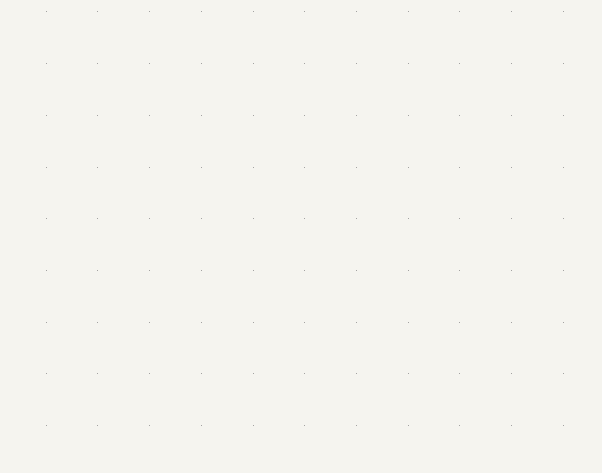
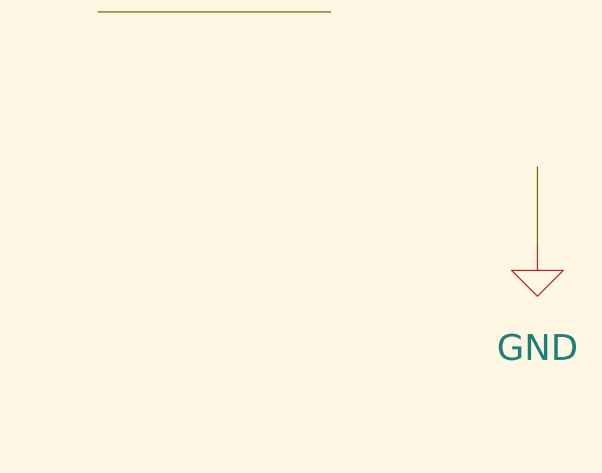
wire: none -> (97, 11) (330, 11)
wire: none -> (537, 167) (537, 244)
power symbol: none -> GND (537, 270)

